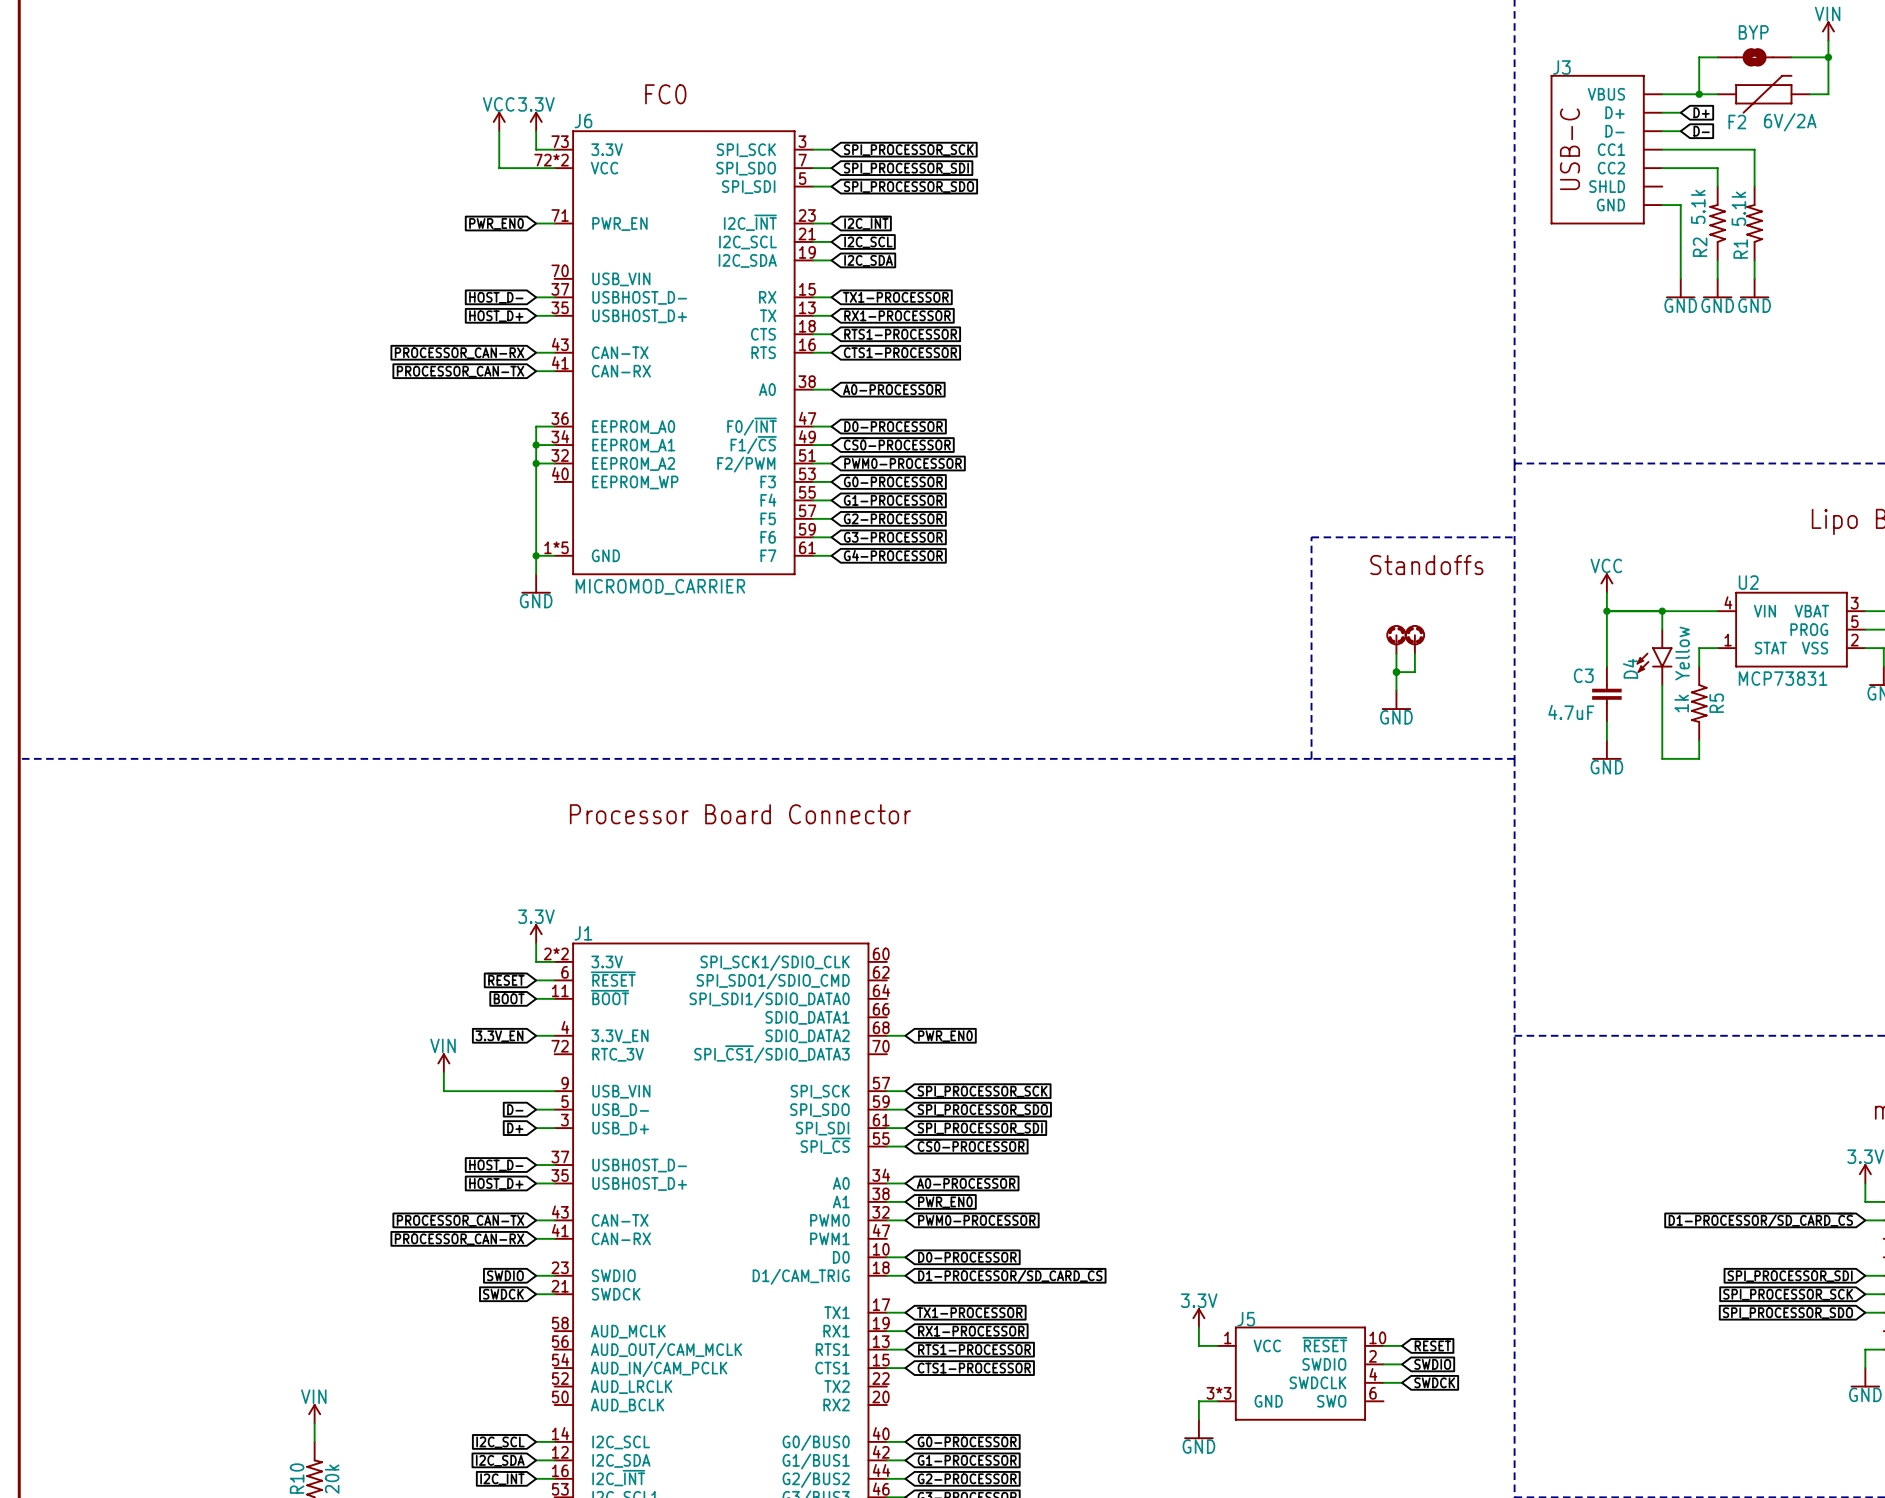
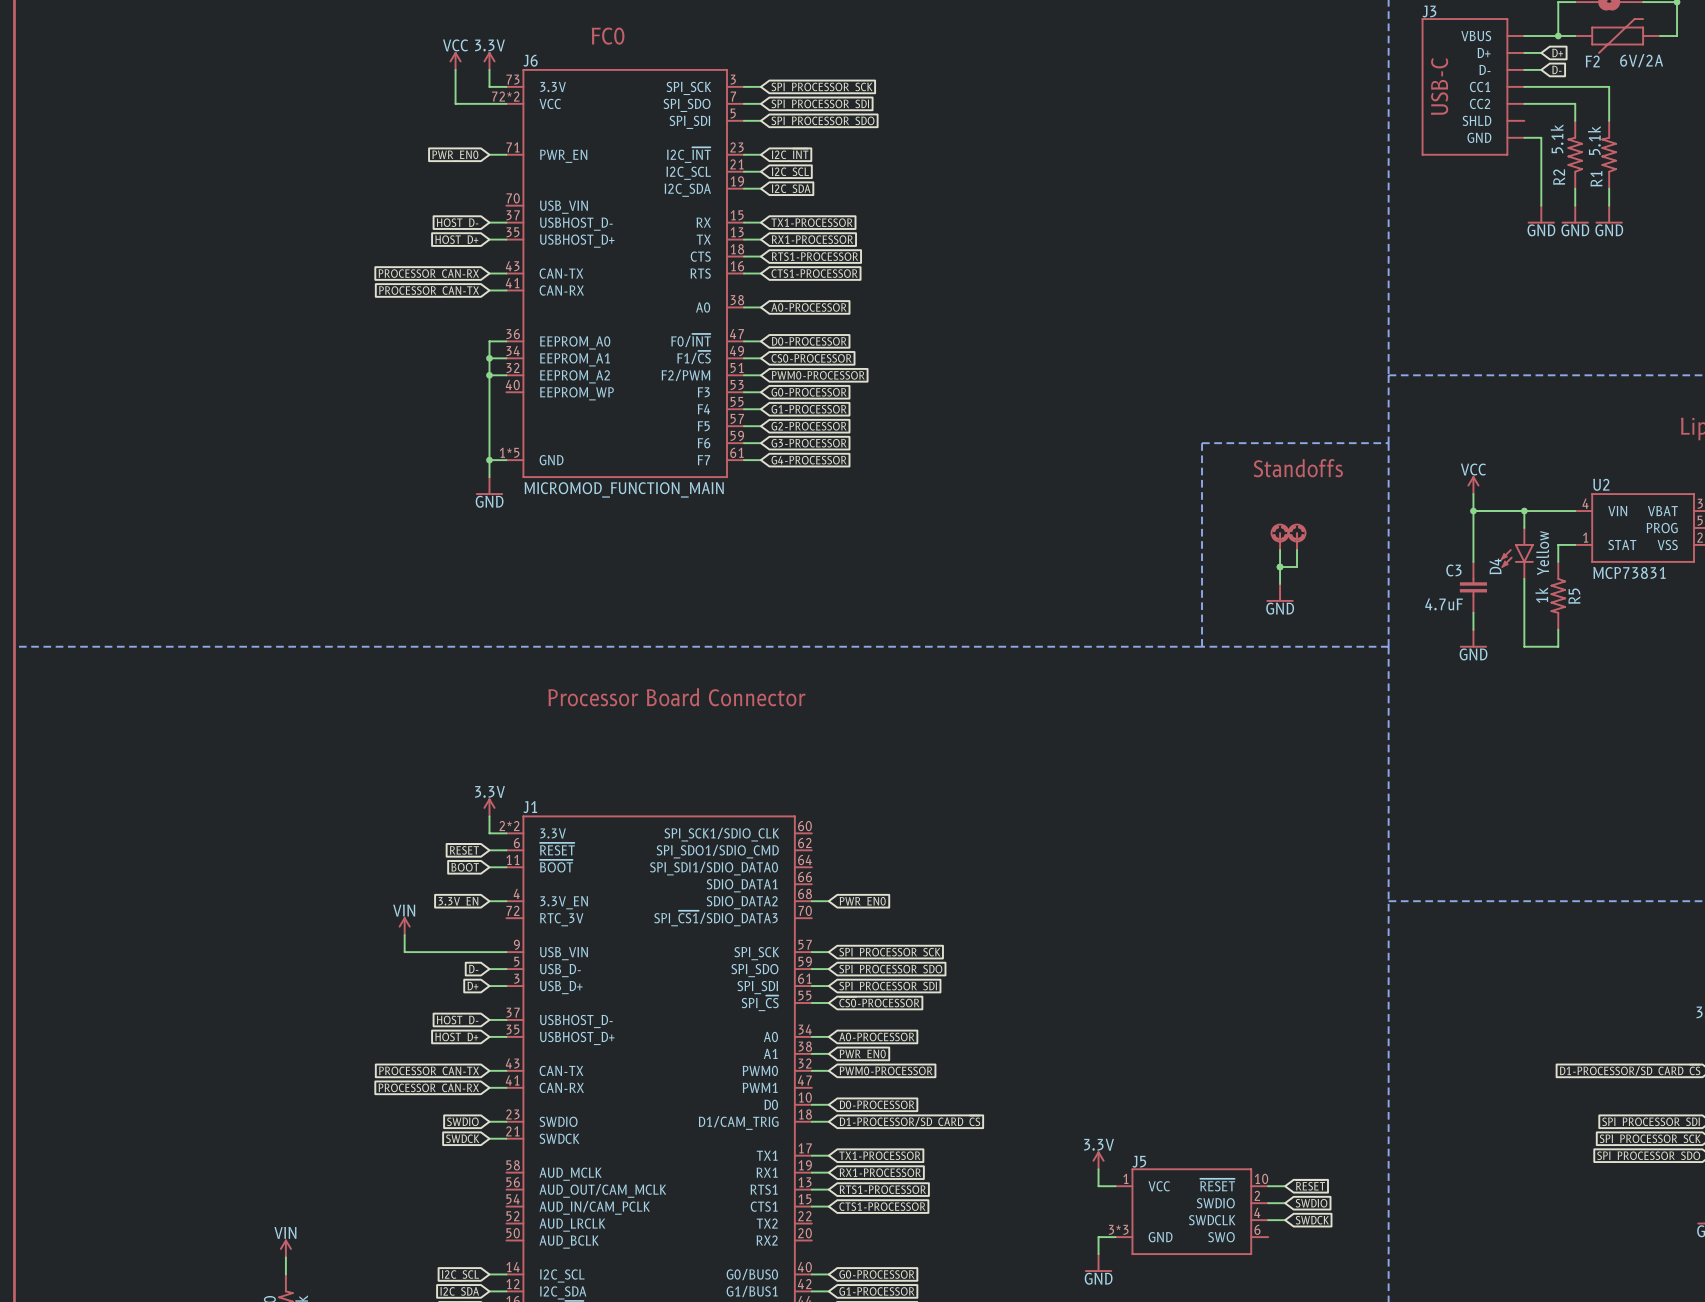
J6 value: MICROMOD_CARRIER (660, 586) -> MICROMOD_FUNCTION_MAIN (624, 489)

